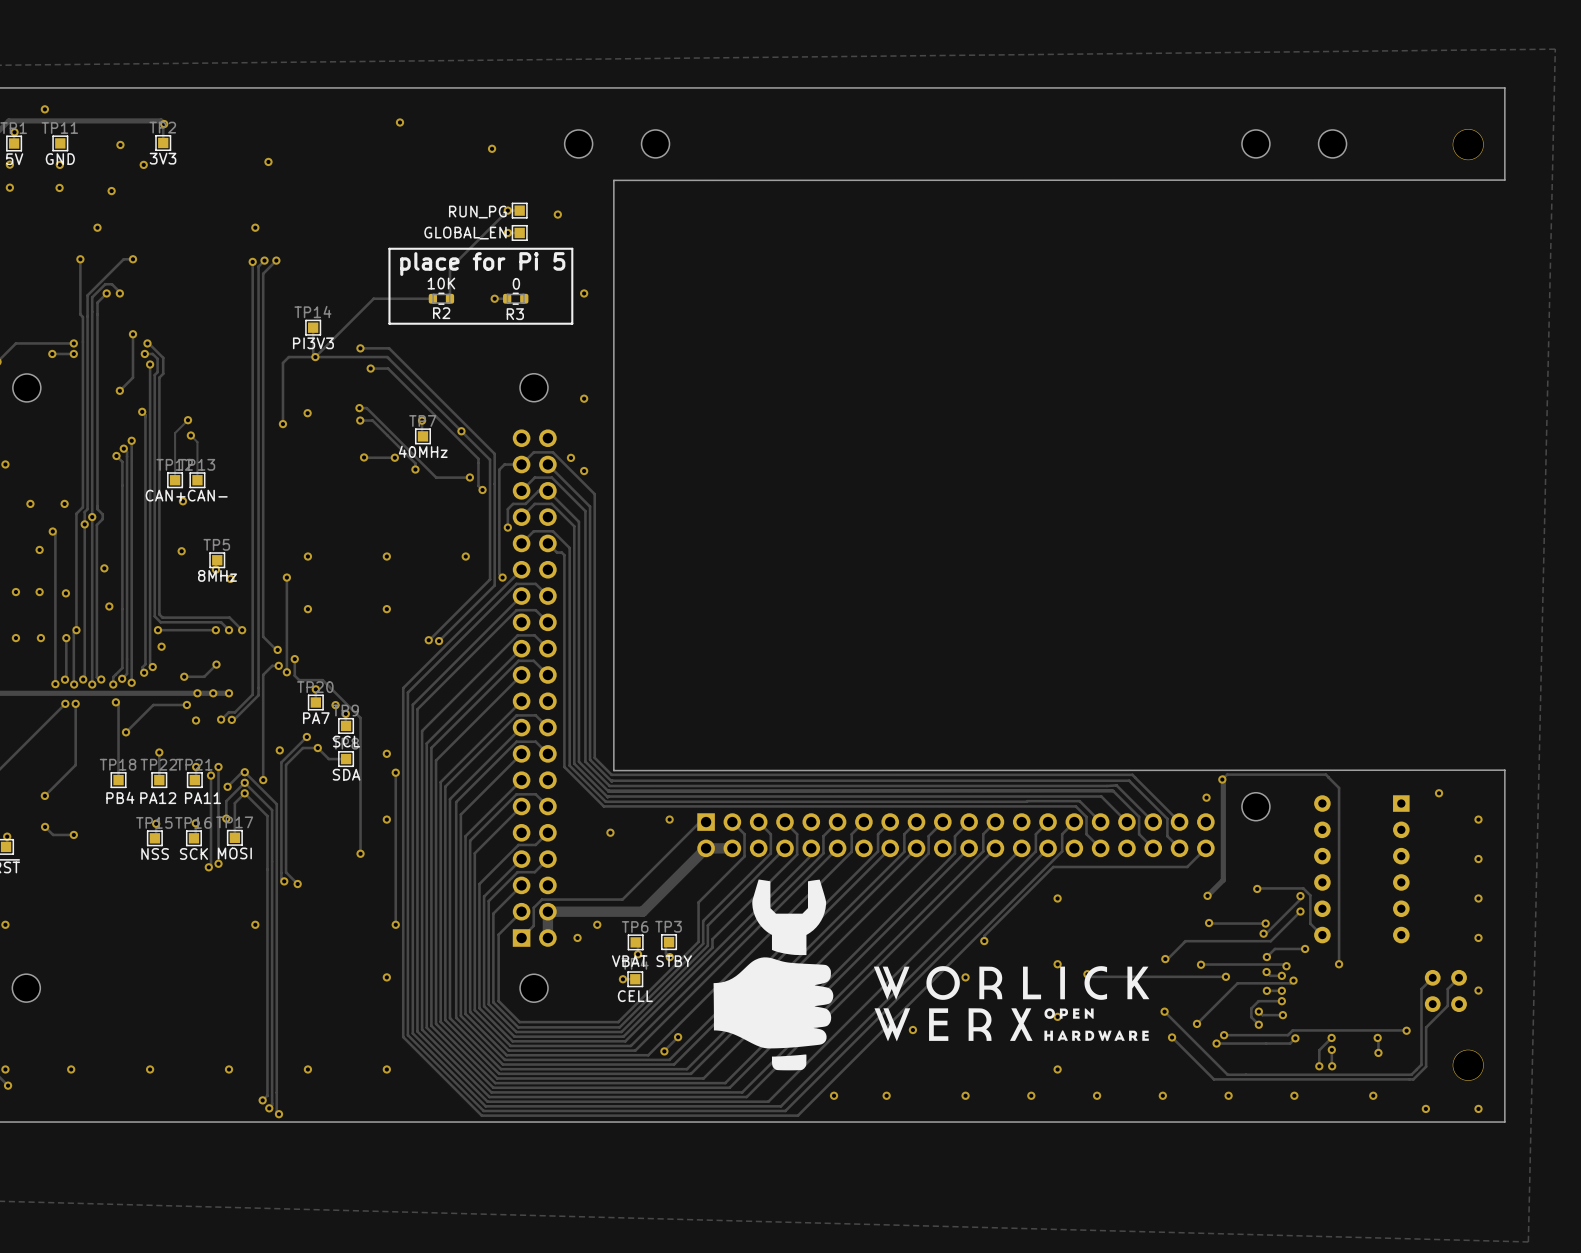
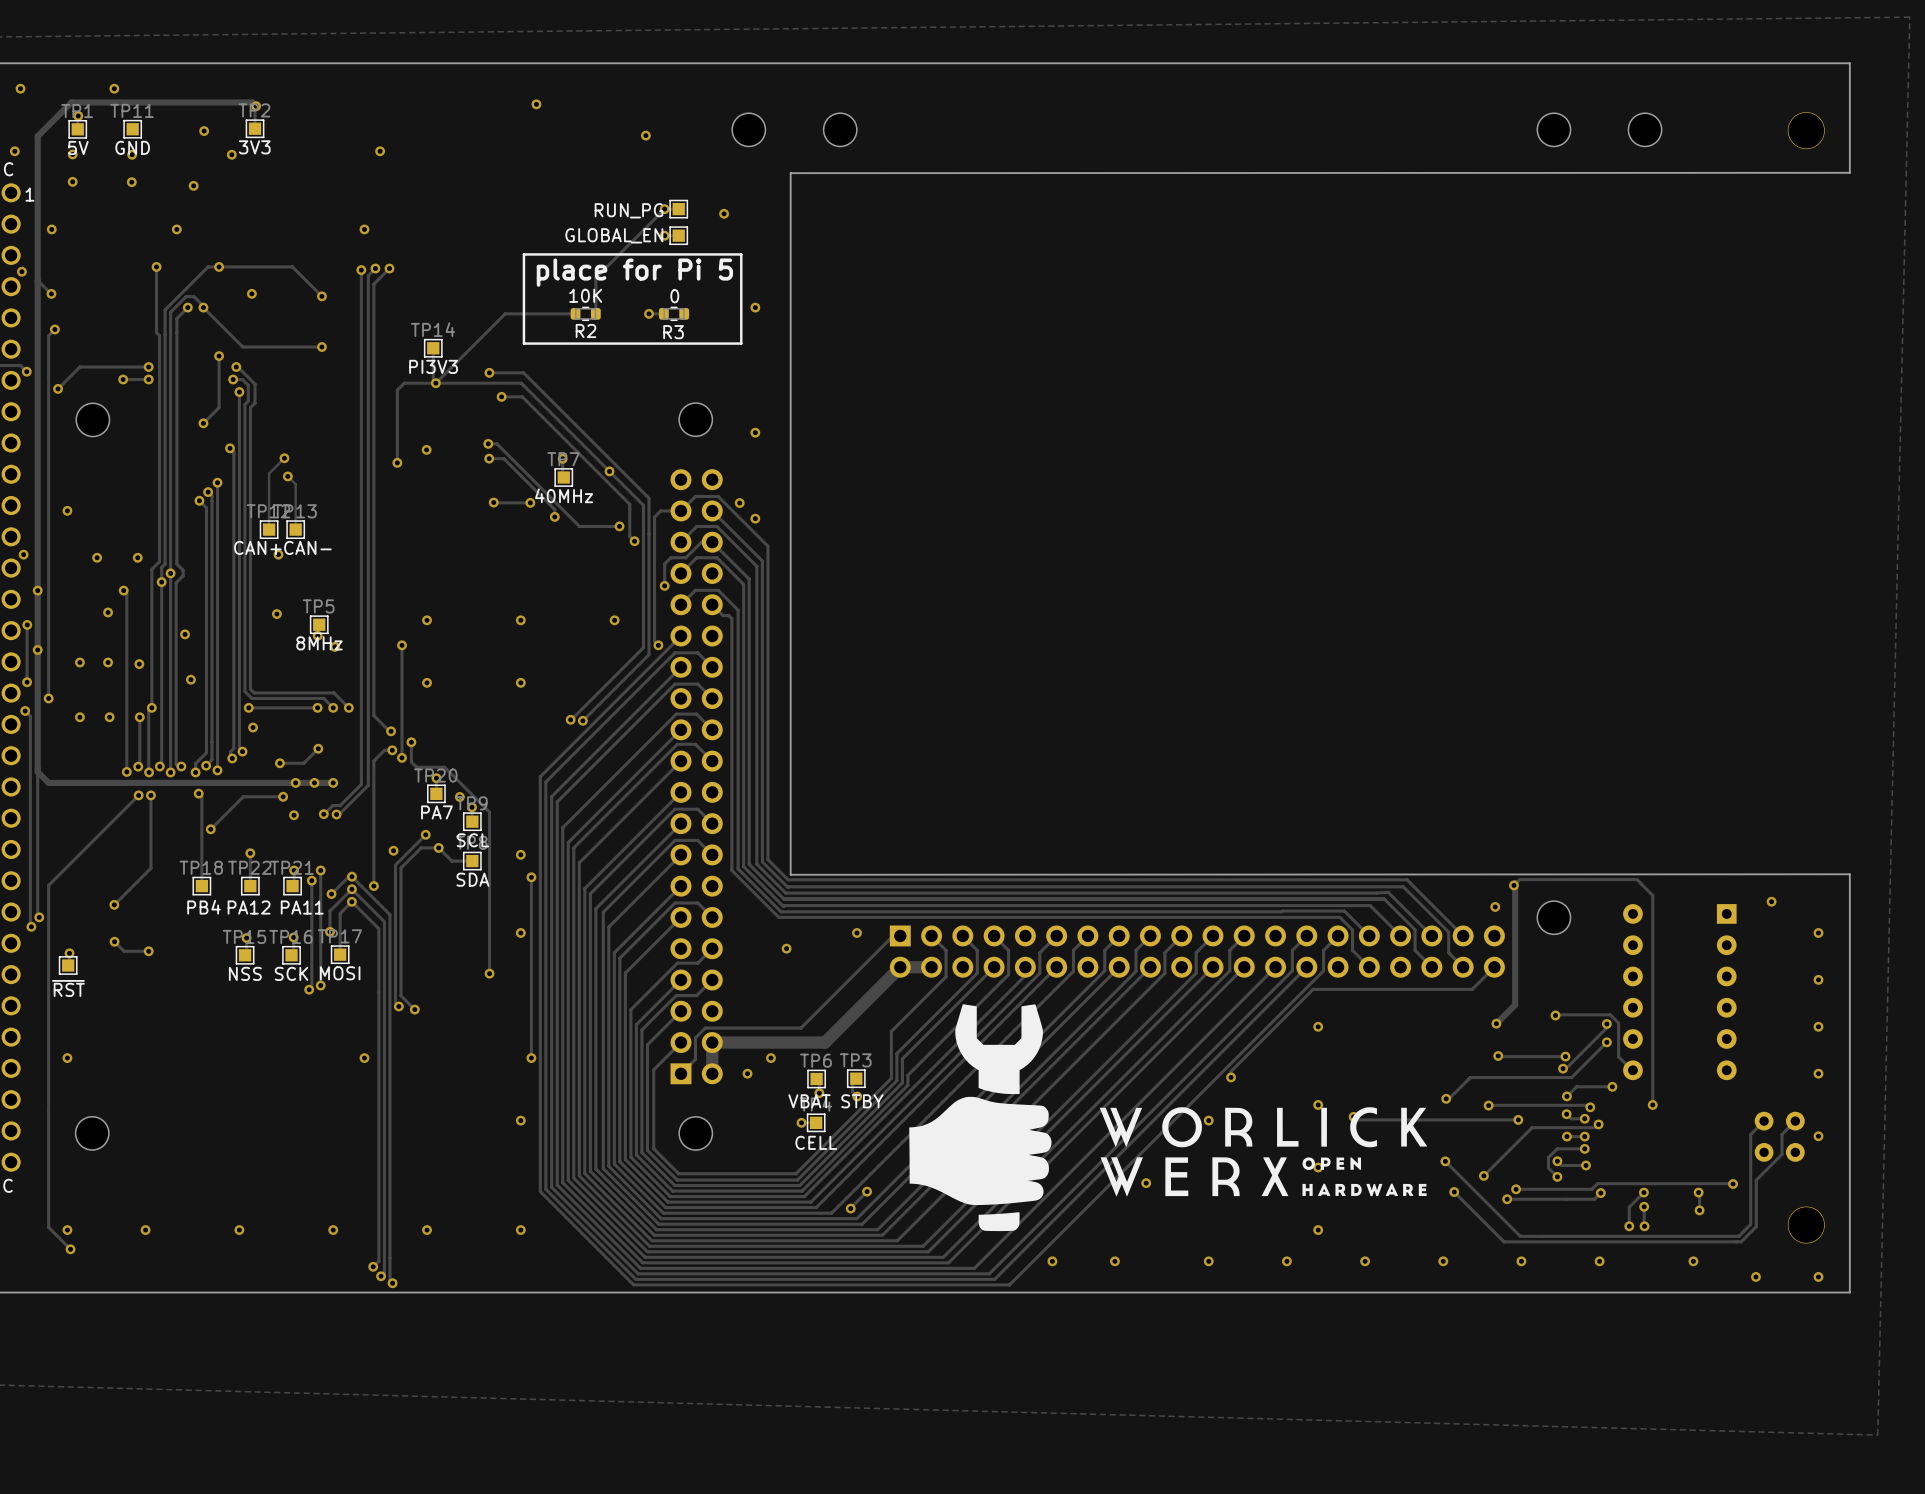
track: none -> (219, 266) (292, 266) (321, 296)
via: none -> (251, 293)
via: none -> (321, 296)
track: none -> (203, 307) (242, 347) (321, 347)
via: none -> (321, 347)

